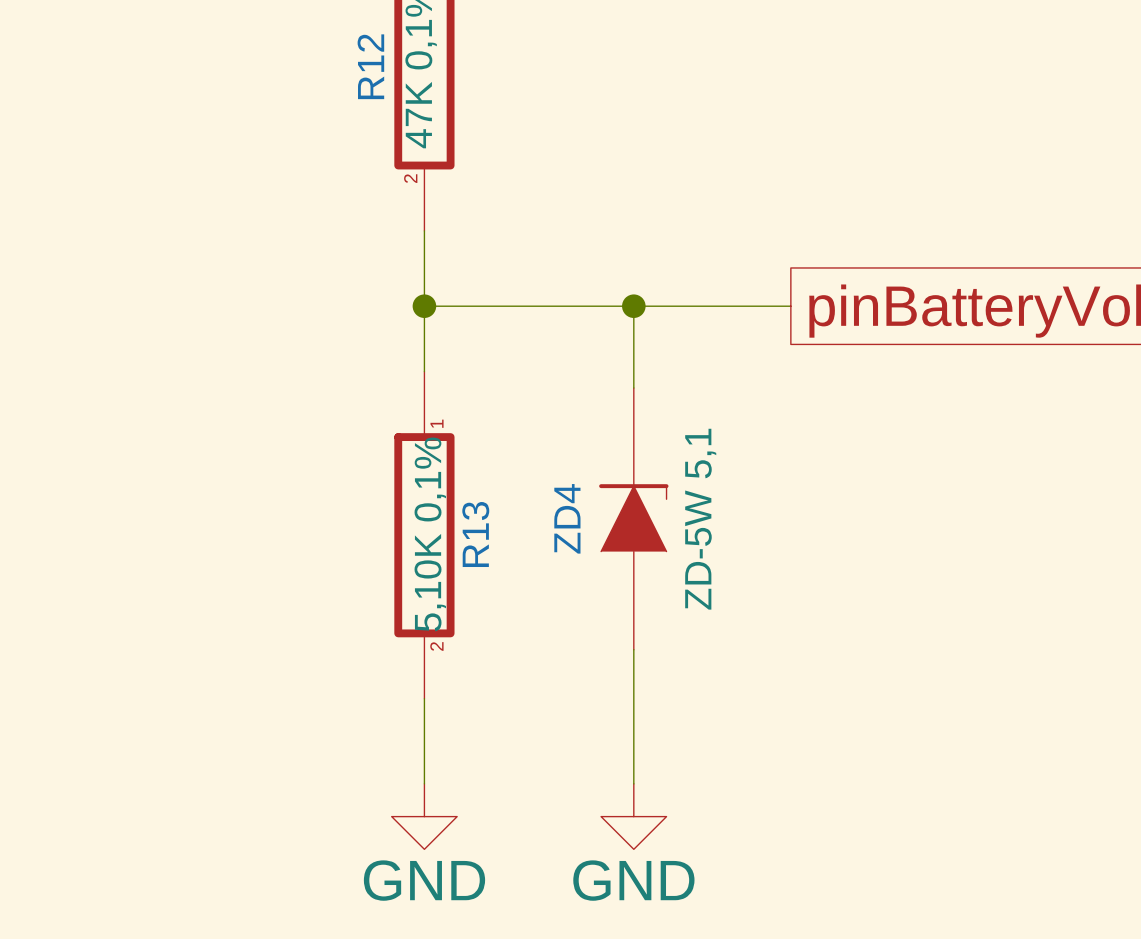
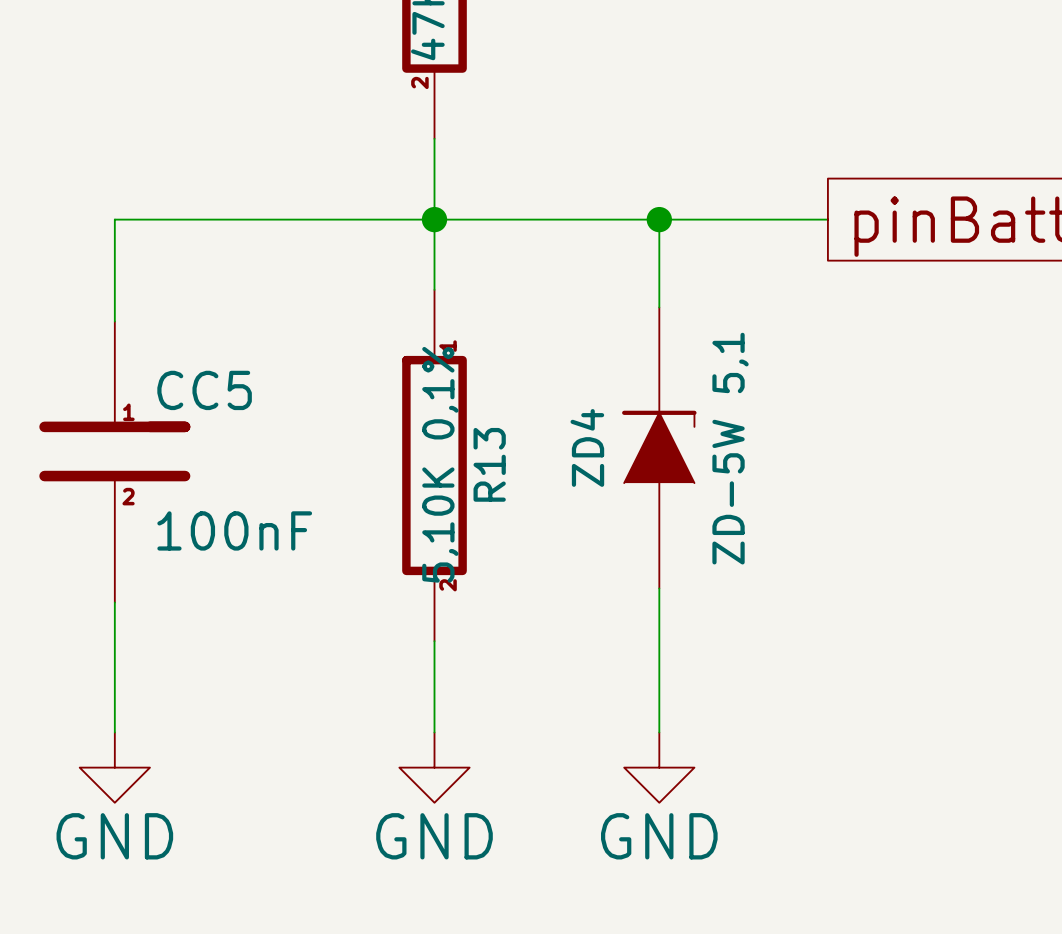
wire: none -> (434, 219) (114, 219) (114, 321)
CC5: none -> 100nF (114, 462)
wire: none -> (114, 602) (114, 732)
power symbol: none -> GND (114, 767)

